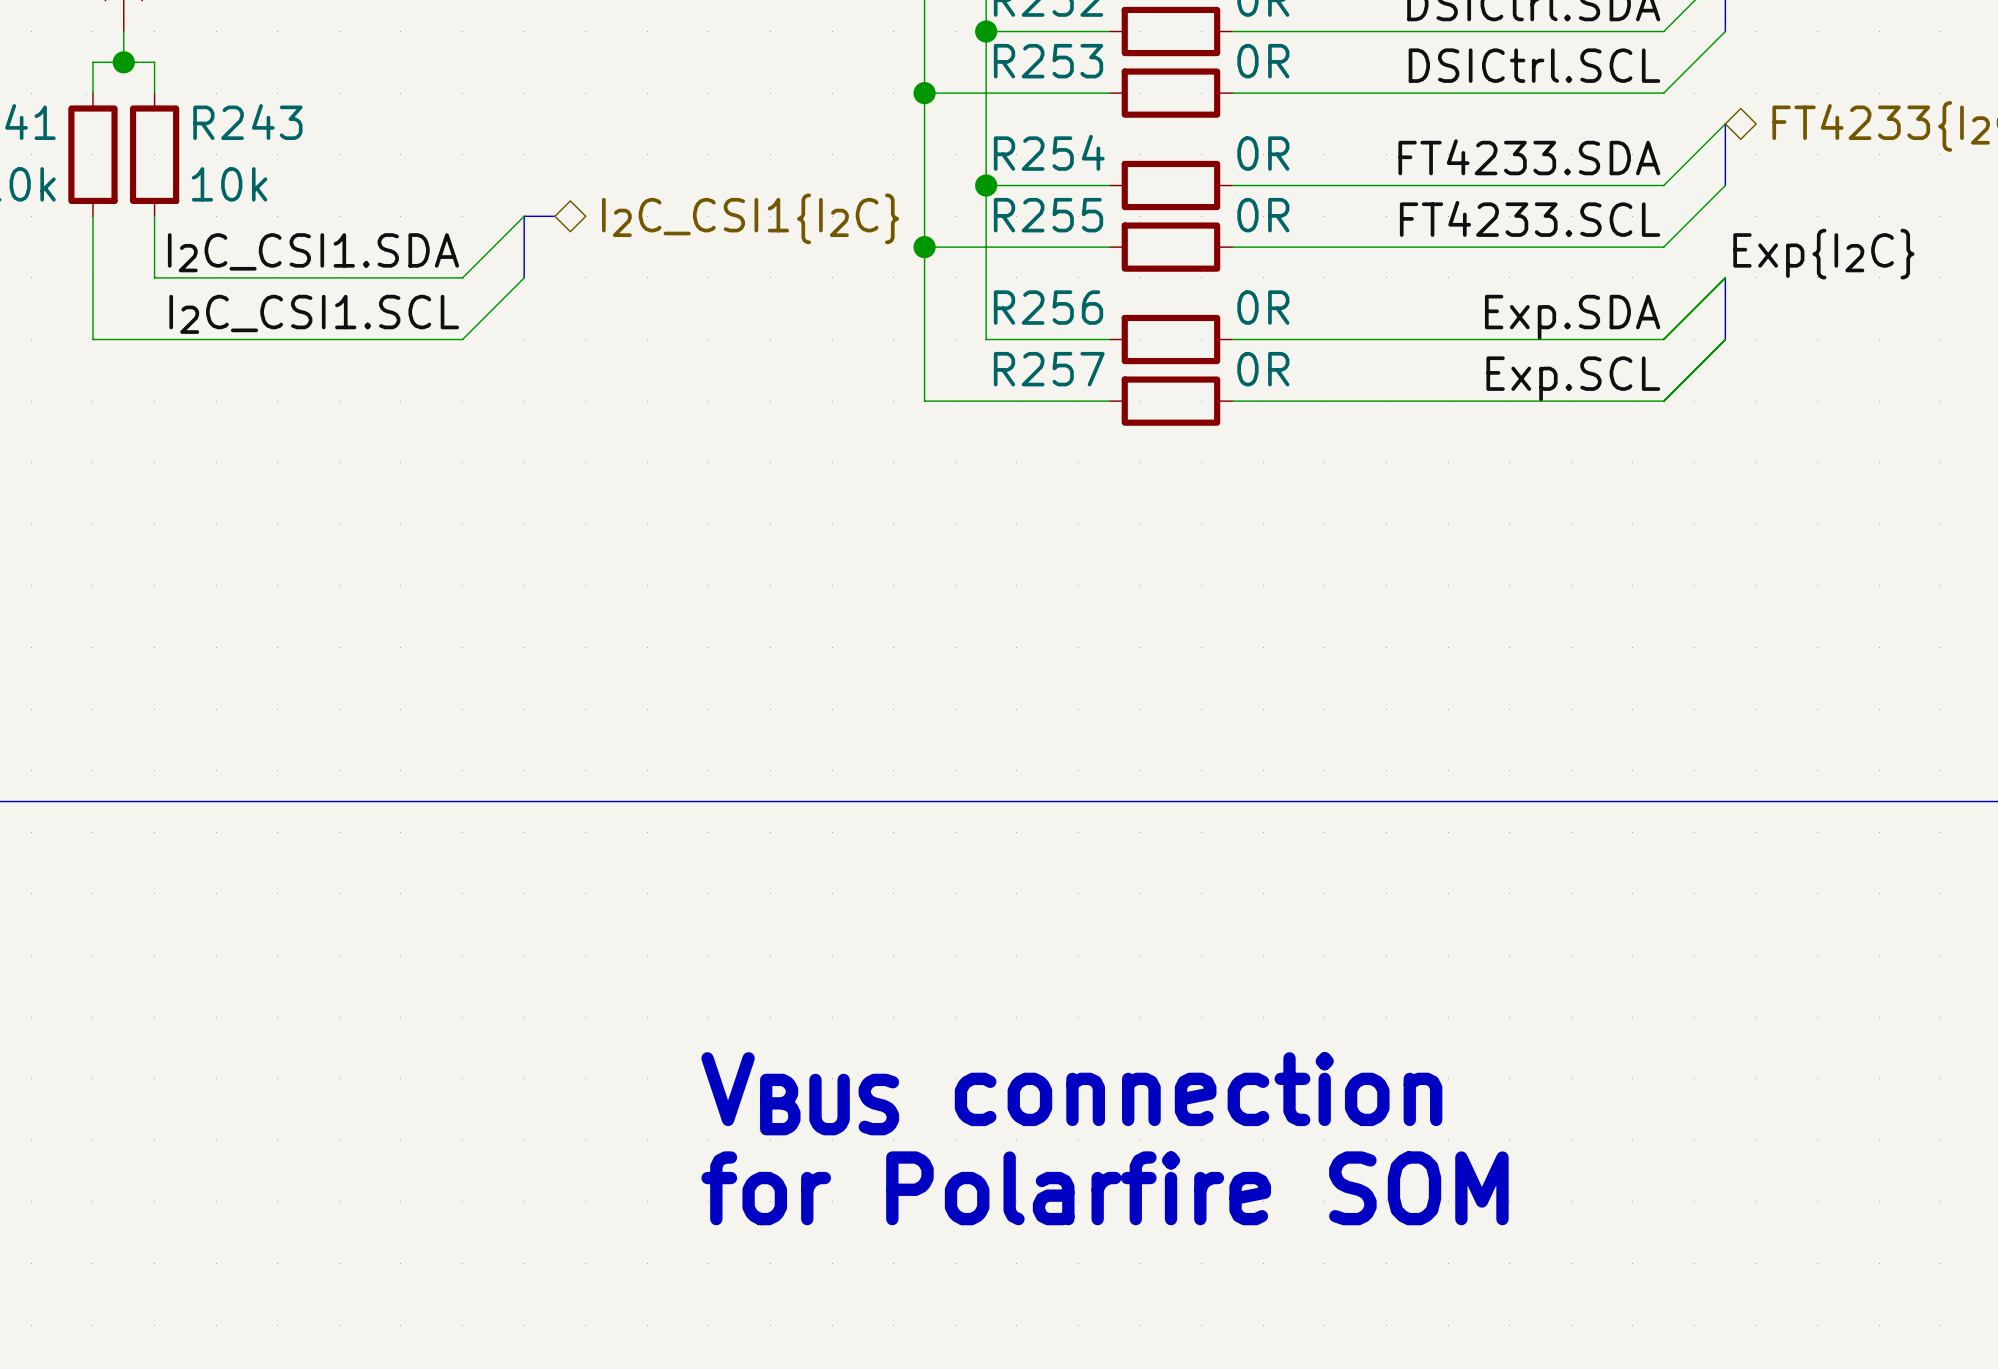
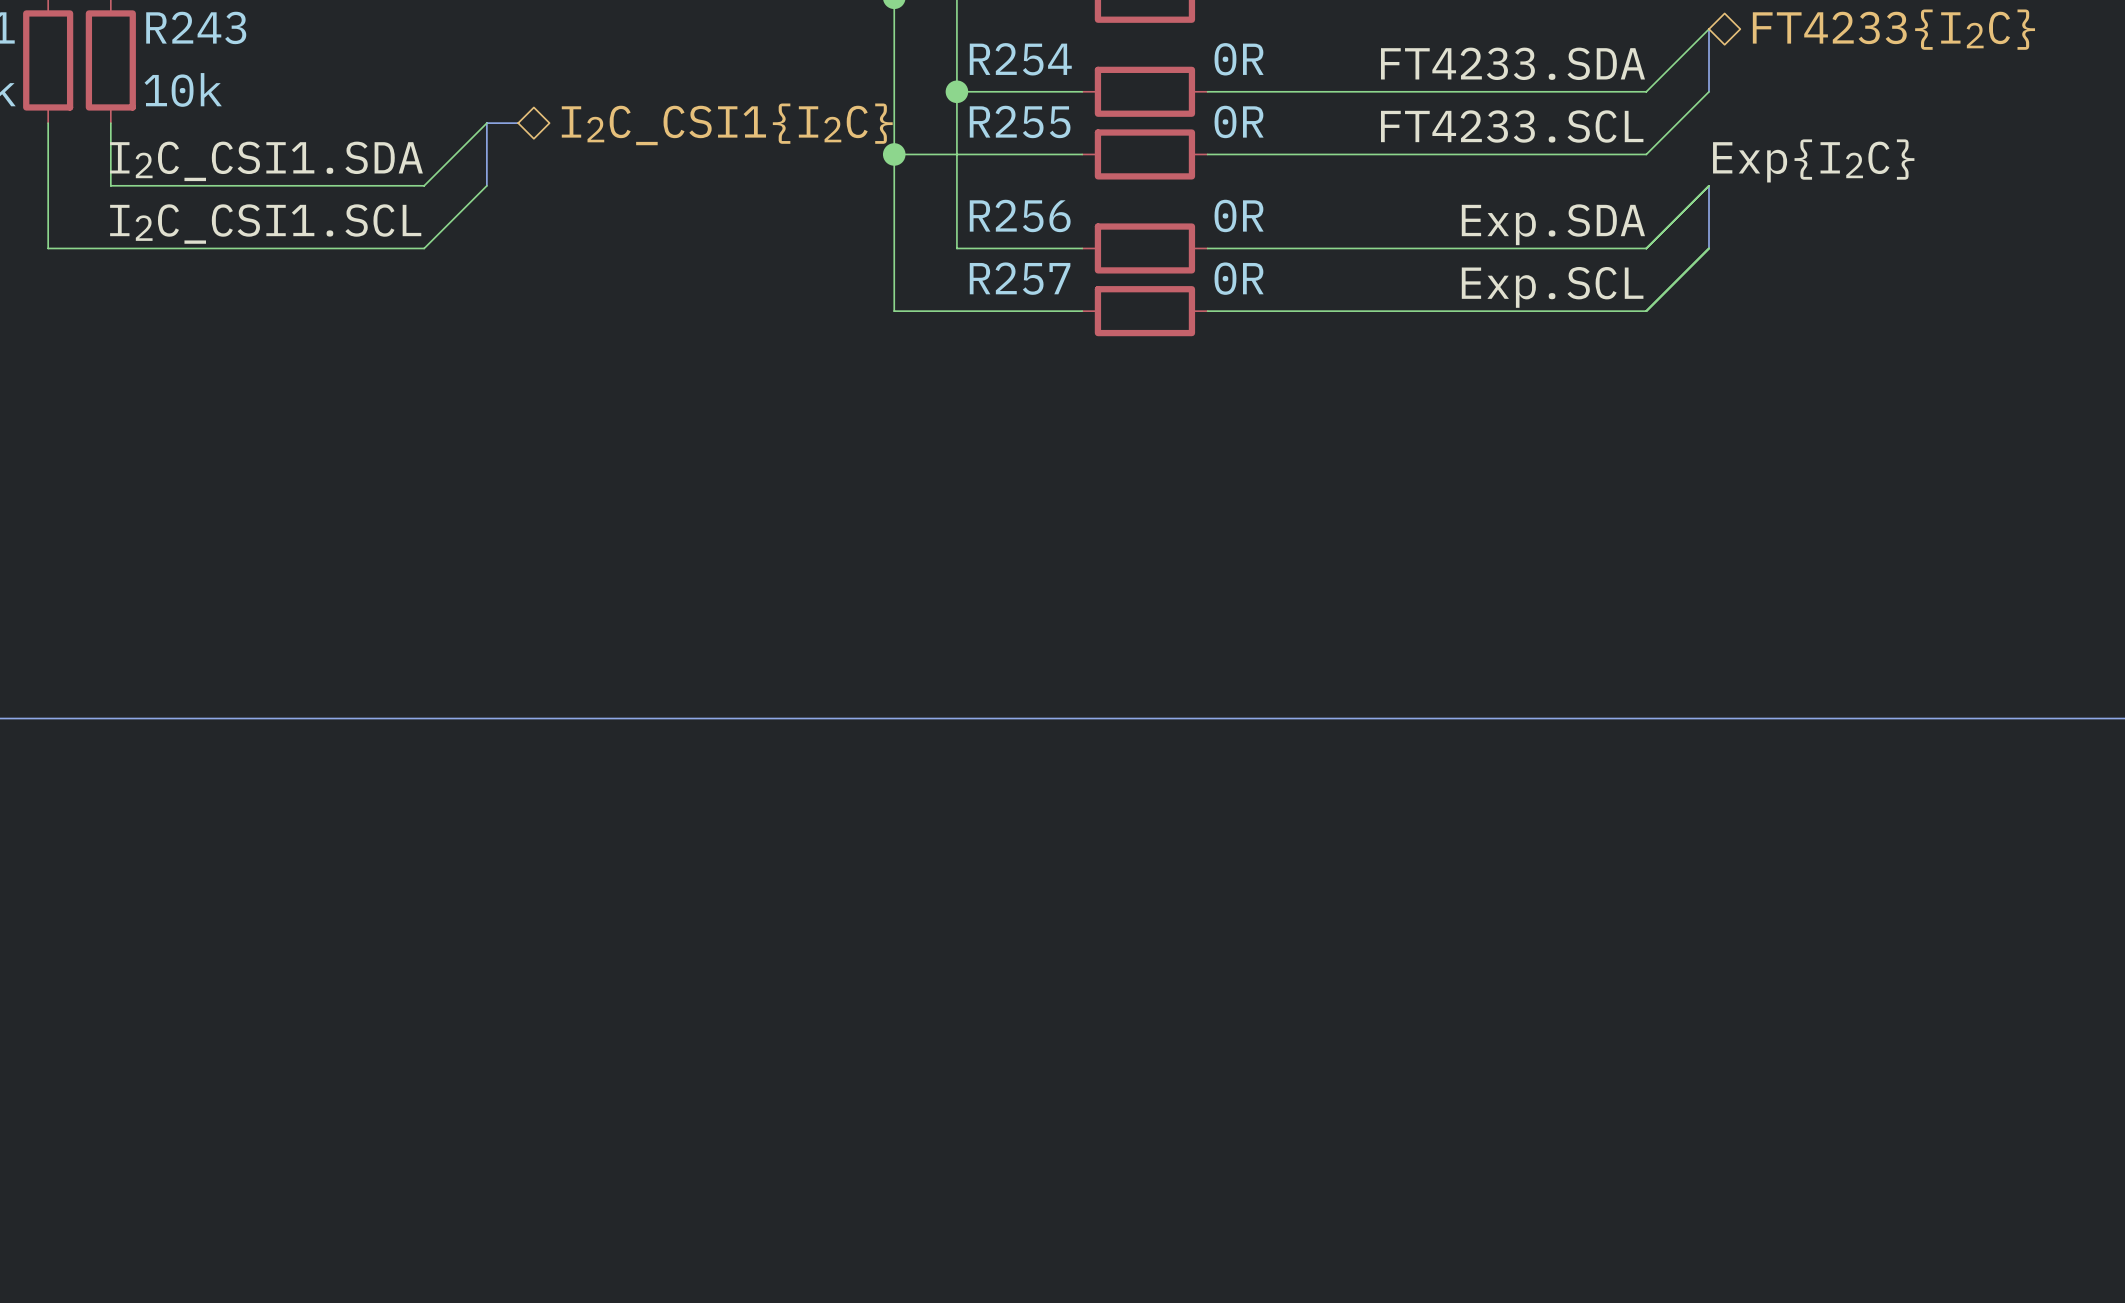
text: VBUS connection (1071, 1093) -> none
text: for Polarfire SOM (1105, 1188) -> none

